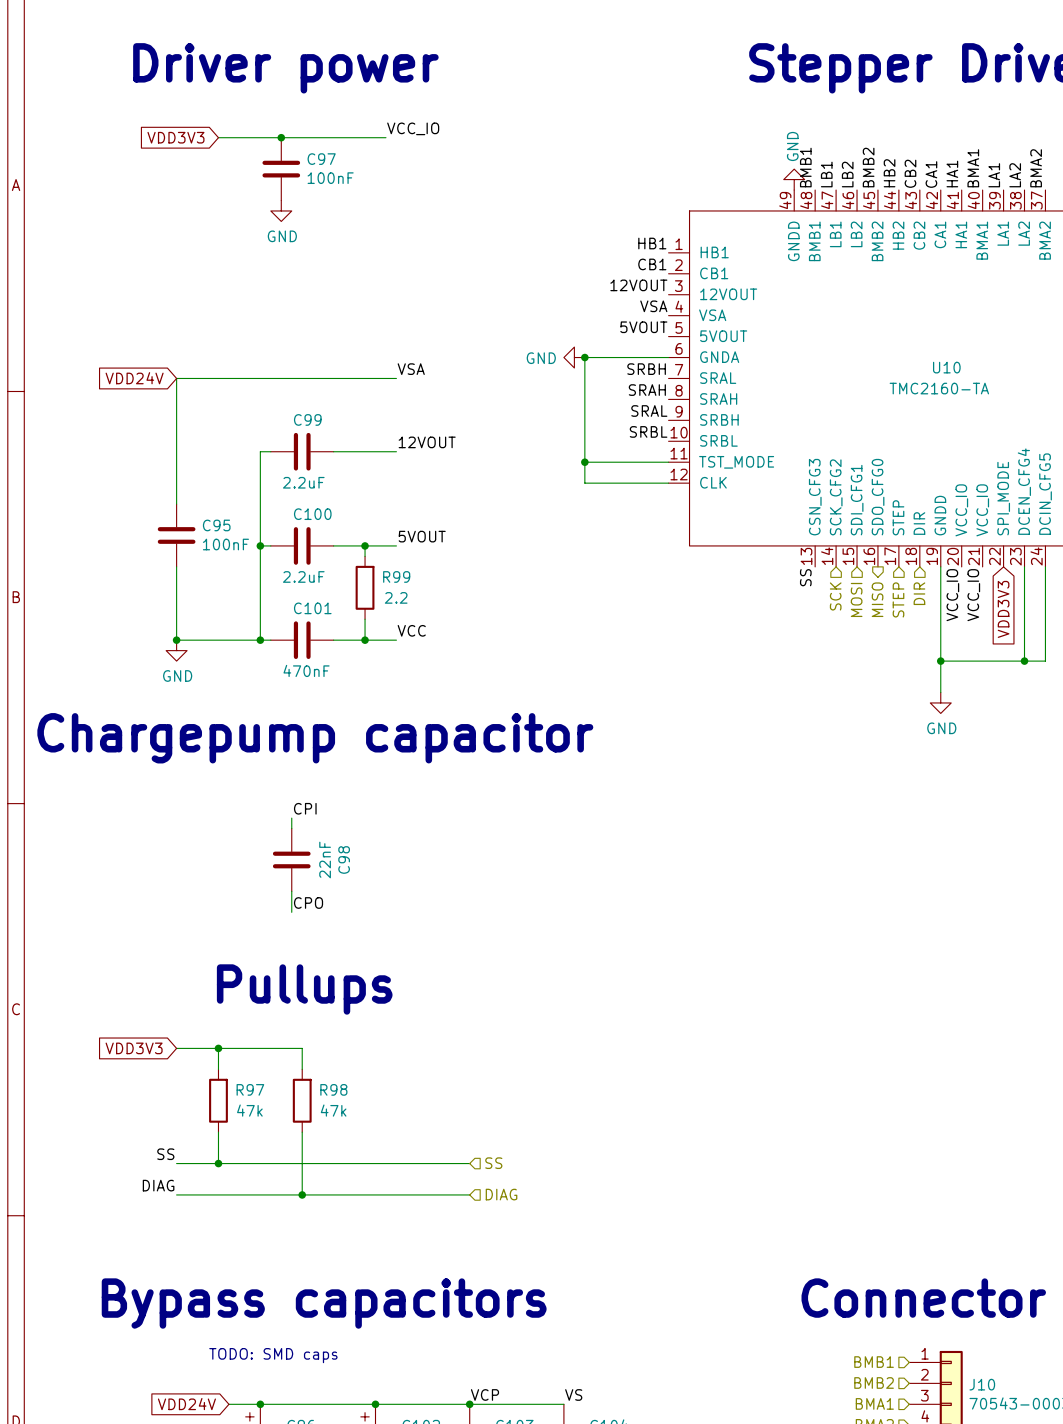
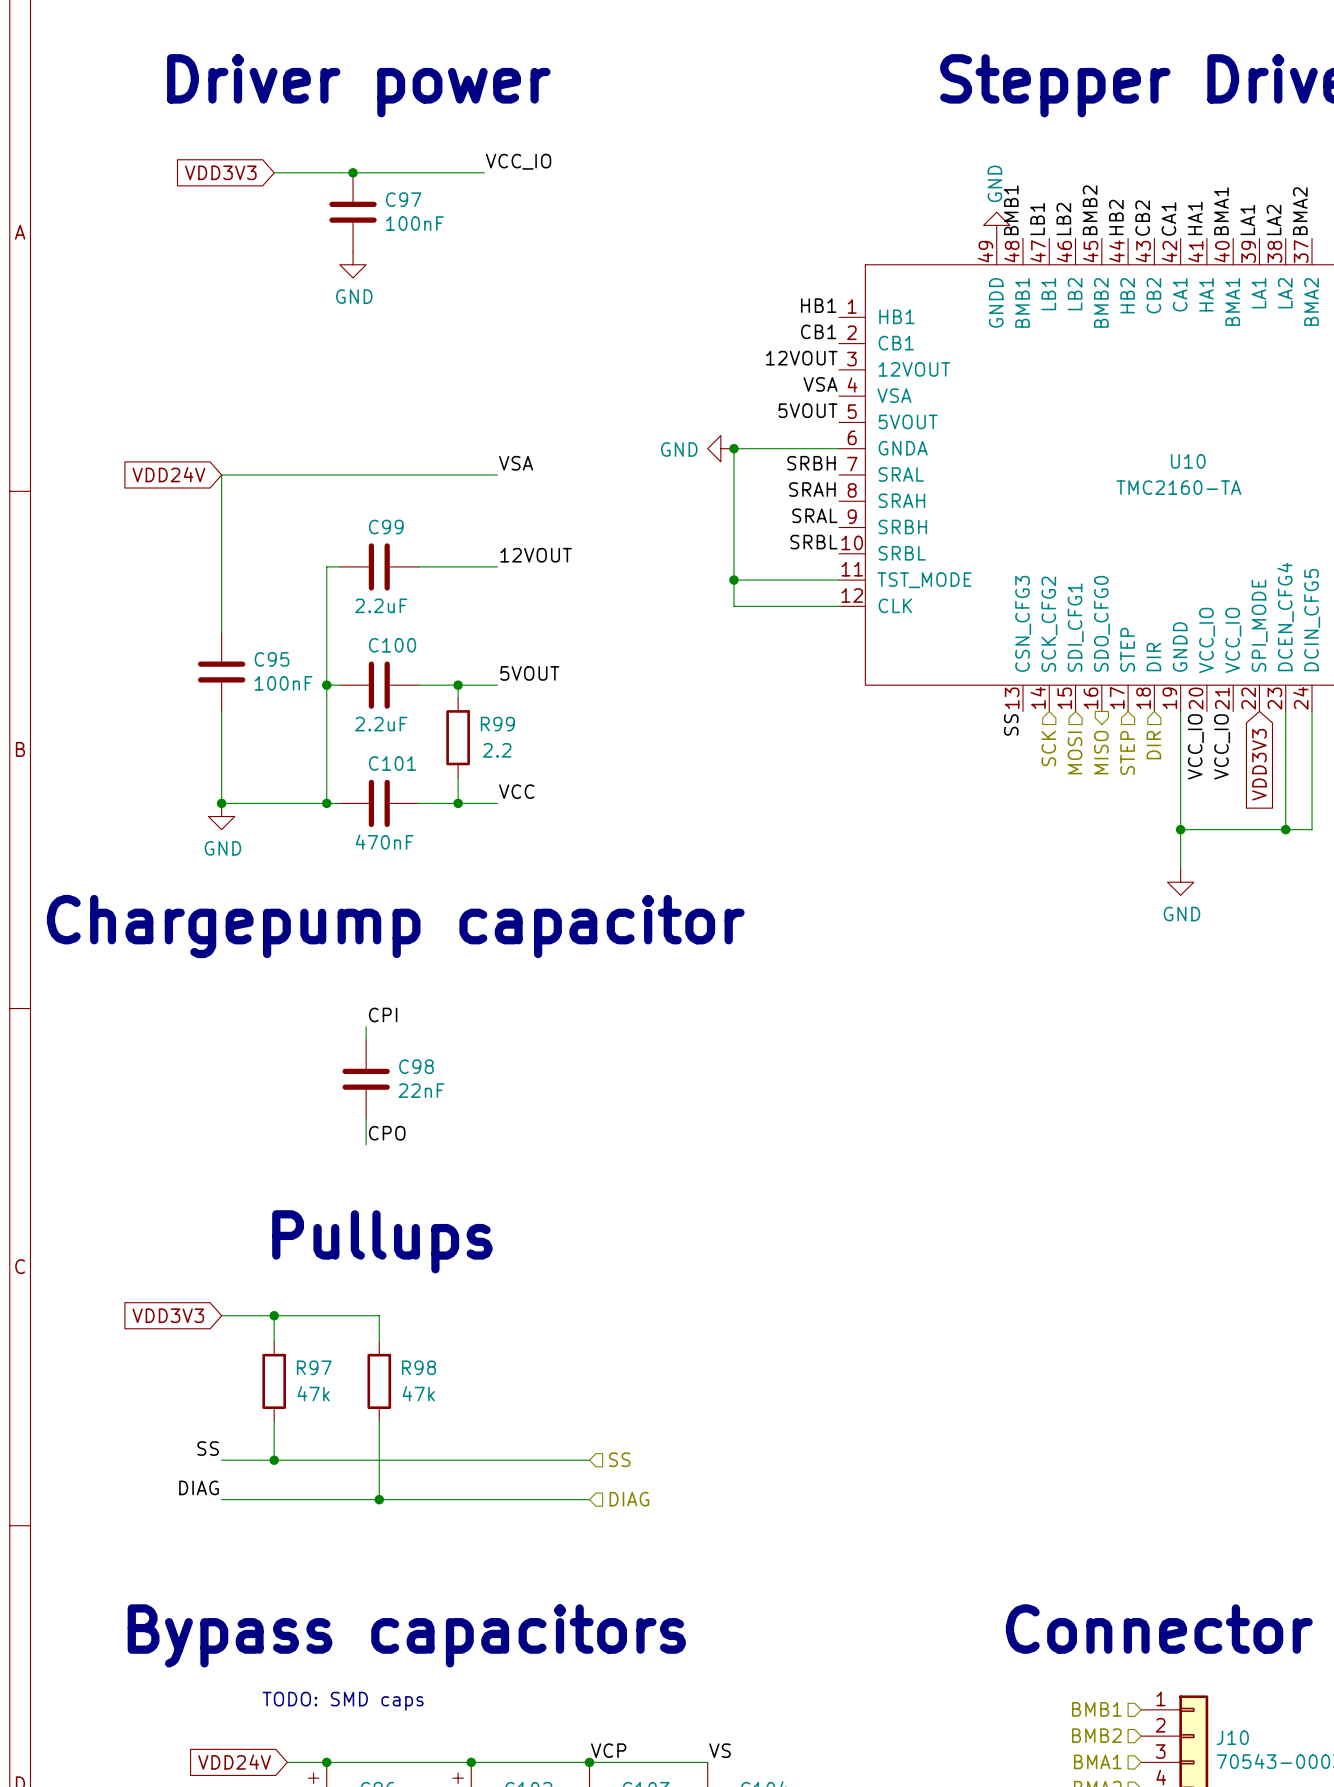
C98 value rotation: 0° (325, 859) -> 90° clockwise (421, 1090)
C98 name rotation: 0° (344, 859) -> 90° clockwise (416, 1066)

